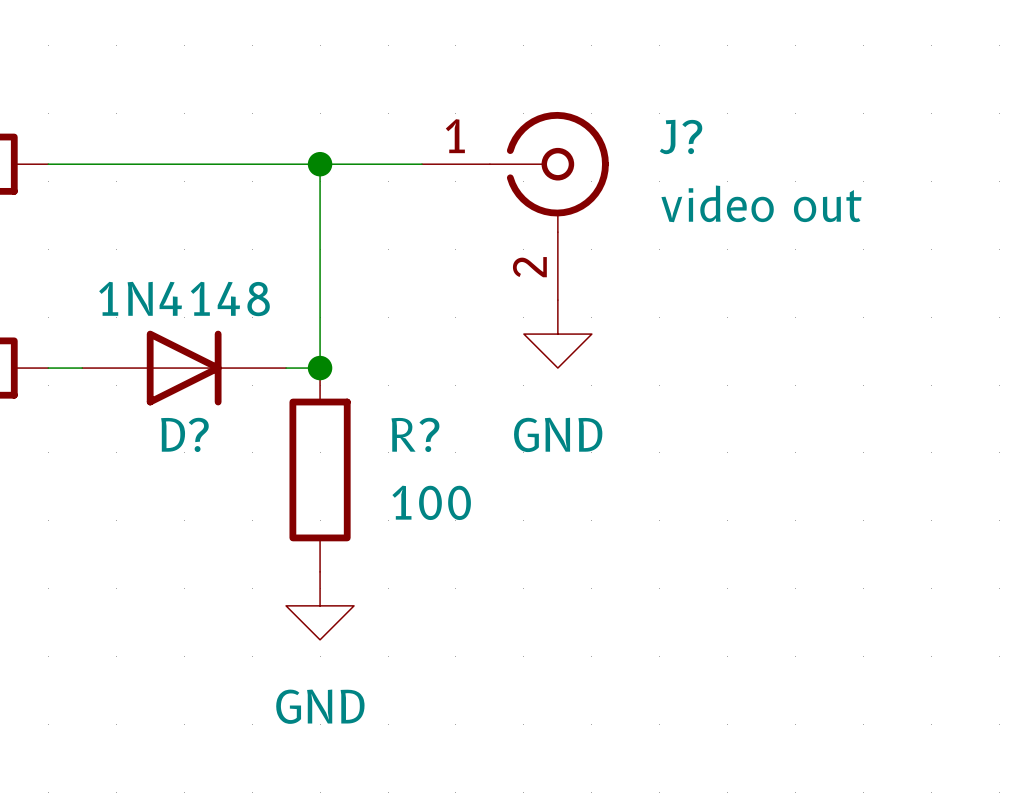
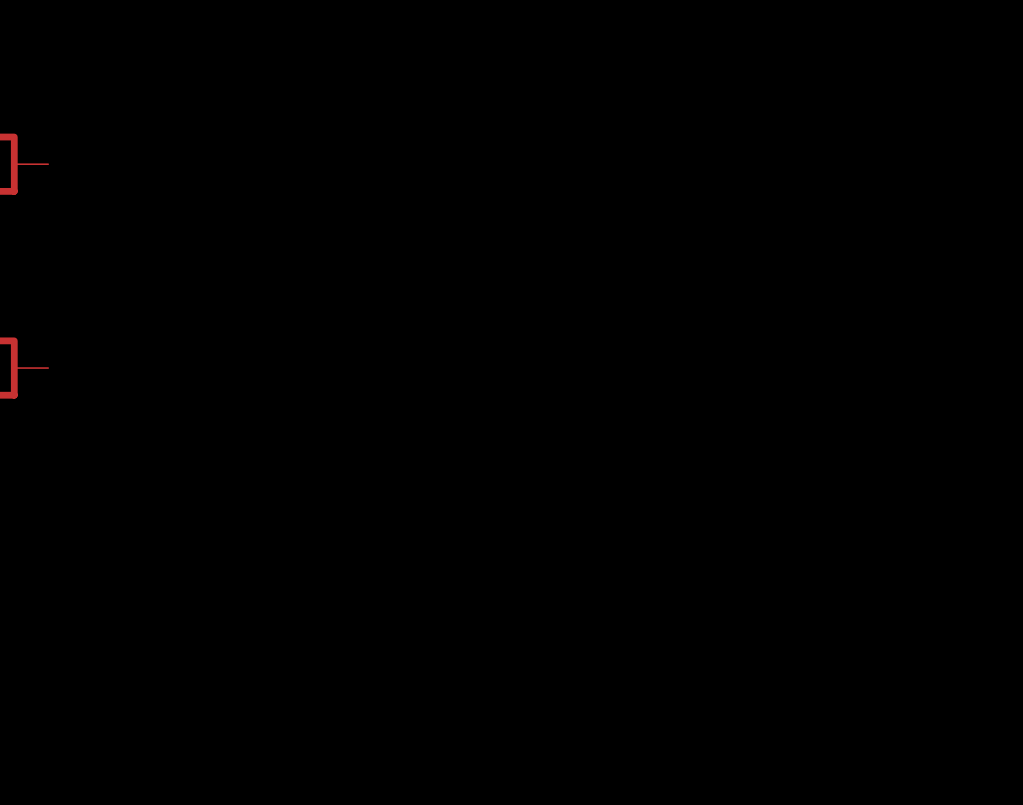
wire: (48, 164) (421, 164) -> none
wire: (320, 164) (320, 368) (286, 368) -> none
junction: (320, 164) -> none
J?: video out (515, 206) -> none
power symbol: GND (557, 334) -> none
wire: (48, 368) (82, 368) -> none
D?: 1N4148 (184, 368) -> none
junction: (320, 368) -> none
R?: 100 (320, 469) -> none
power symbol: GND (320, 605) -> none

